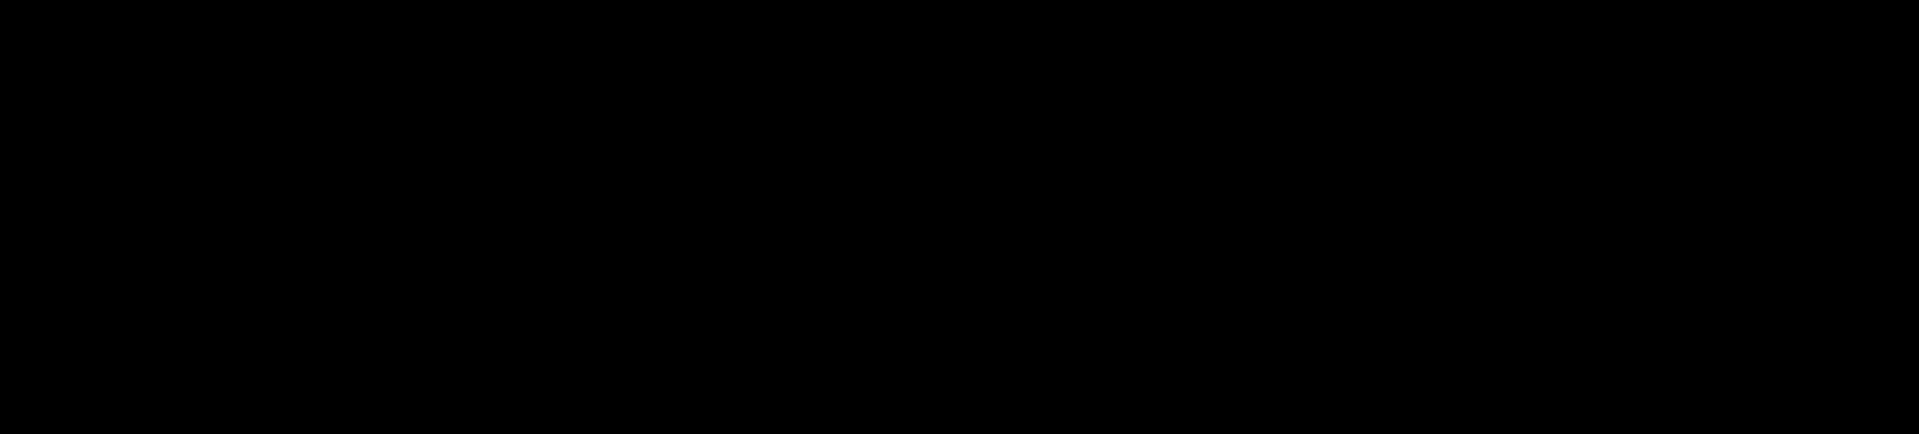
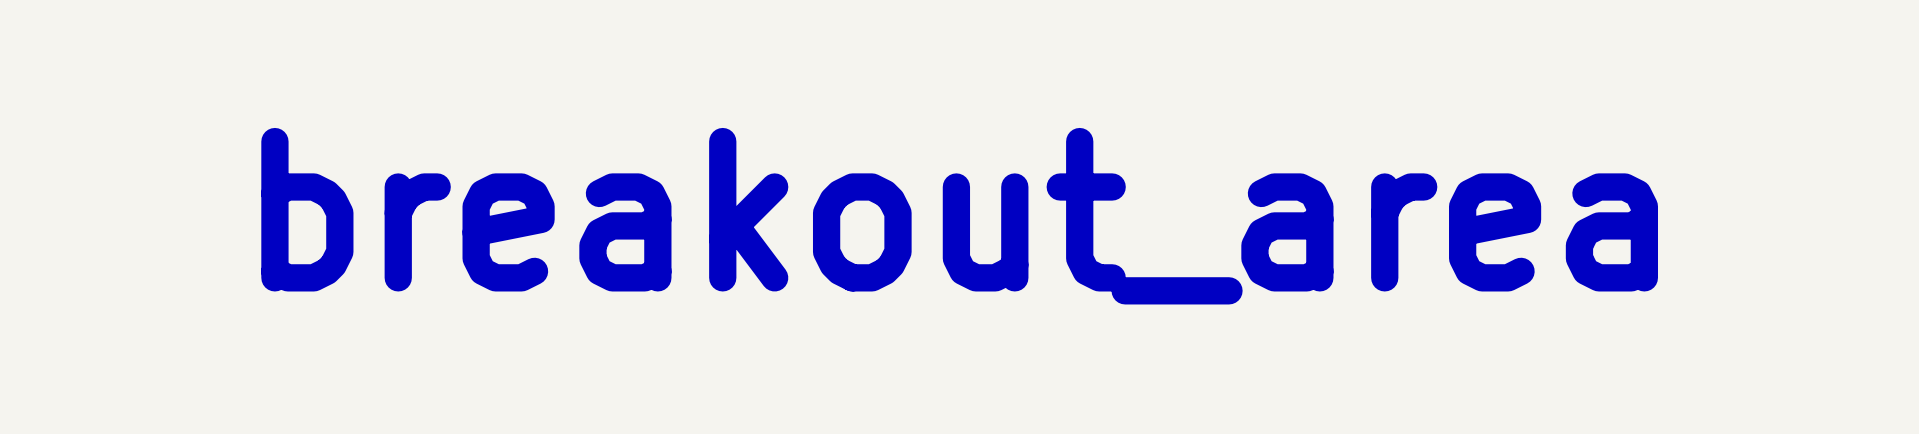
text: none -> breakout_area (959, 216)

